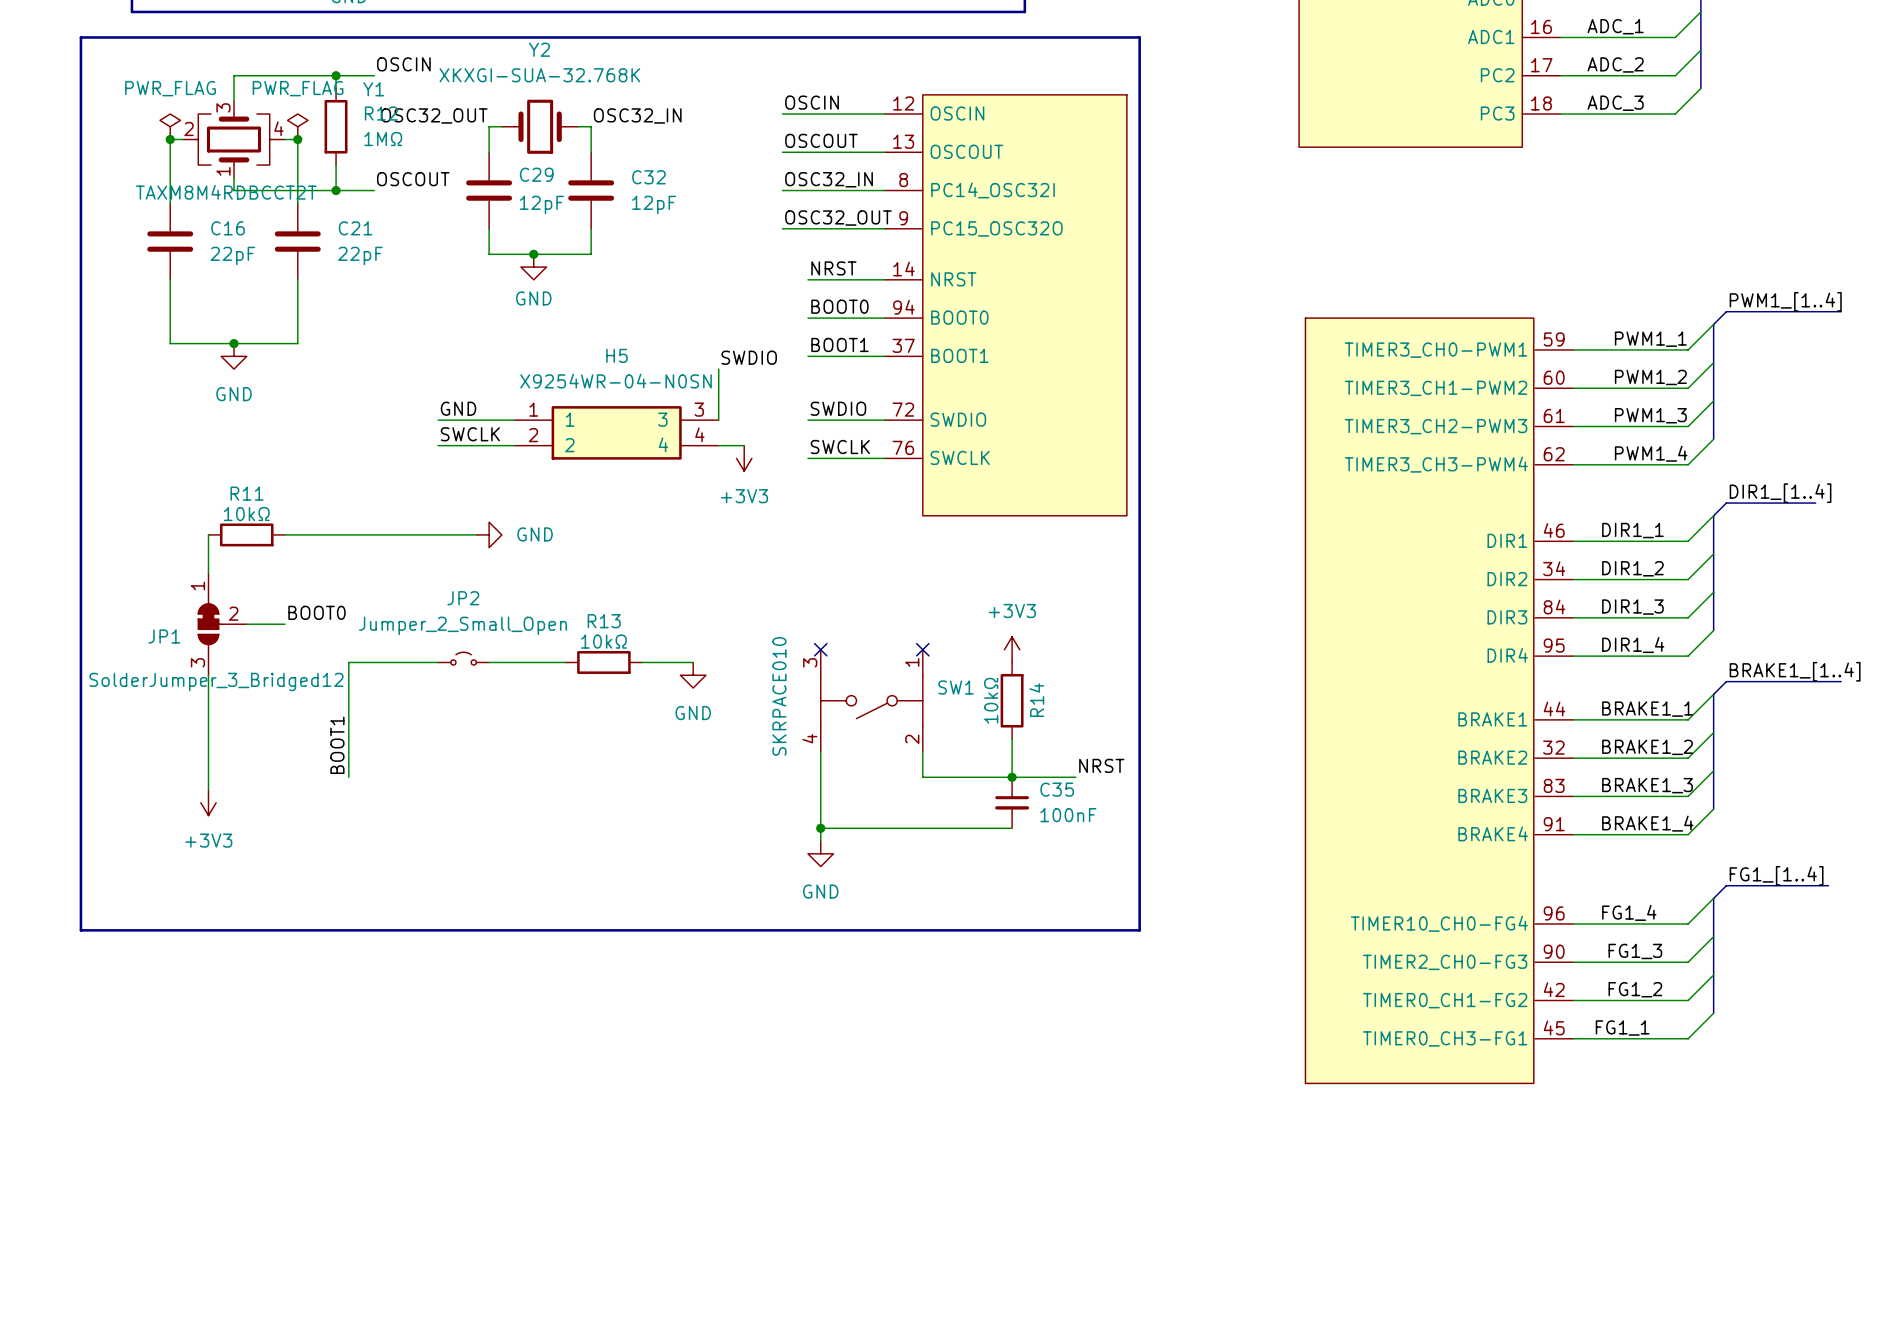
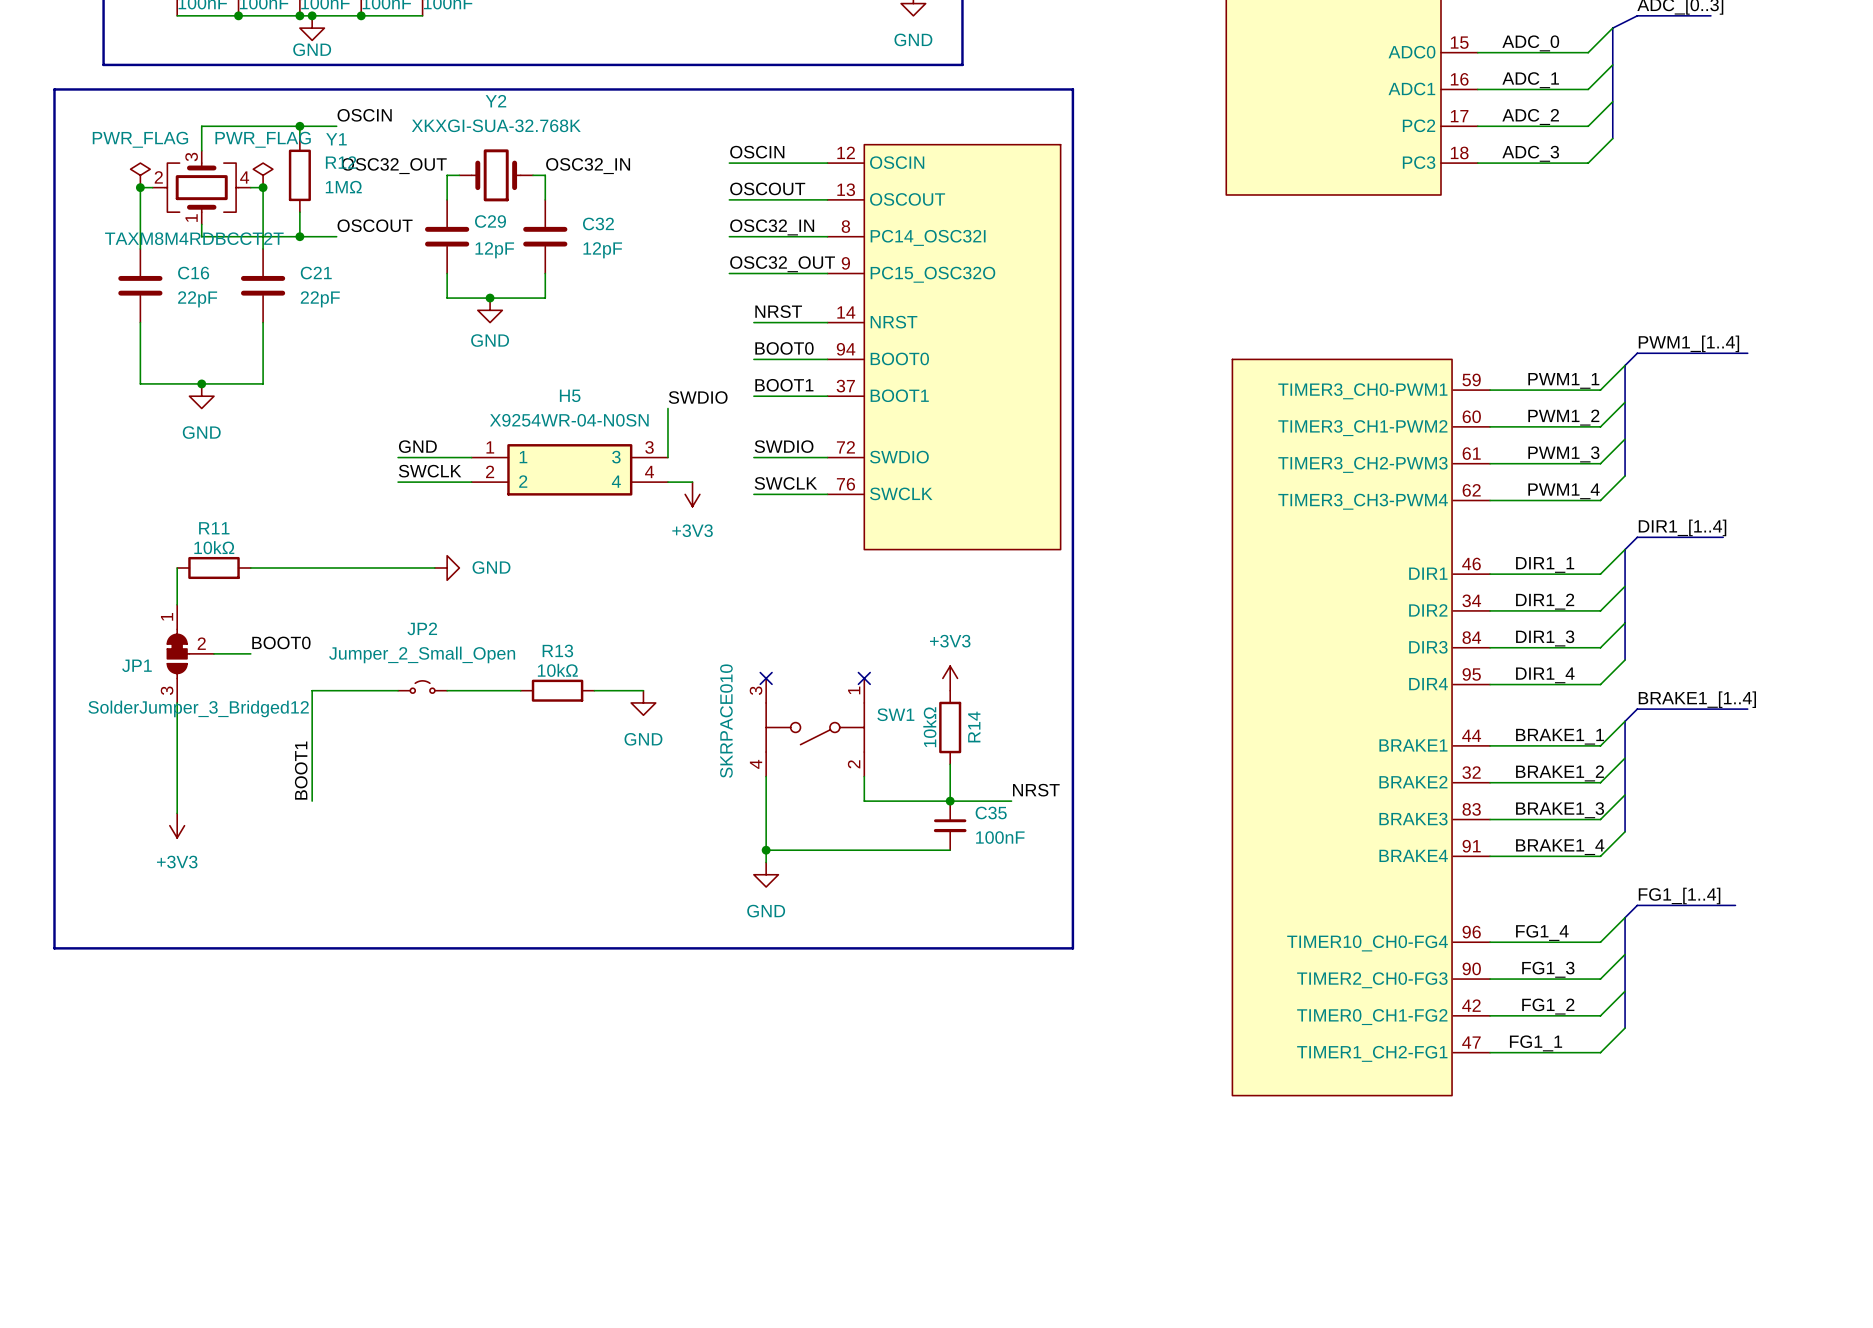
part pin number: 45 (1554, 1027) -> 47 (1471, 1042)
part pin name: TIMER0_CH3-FG1 (1445, 1038) -> TIMER1_CH2-FG1 (1372, 1053)

